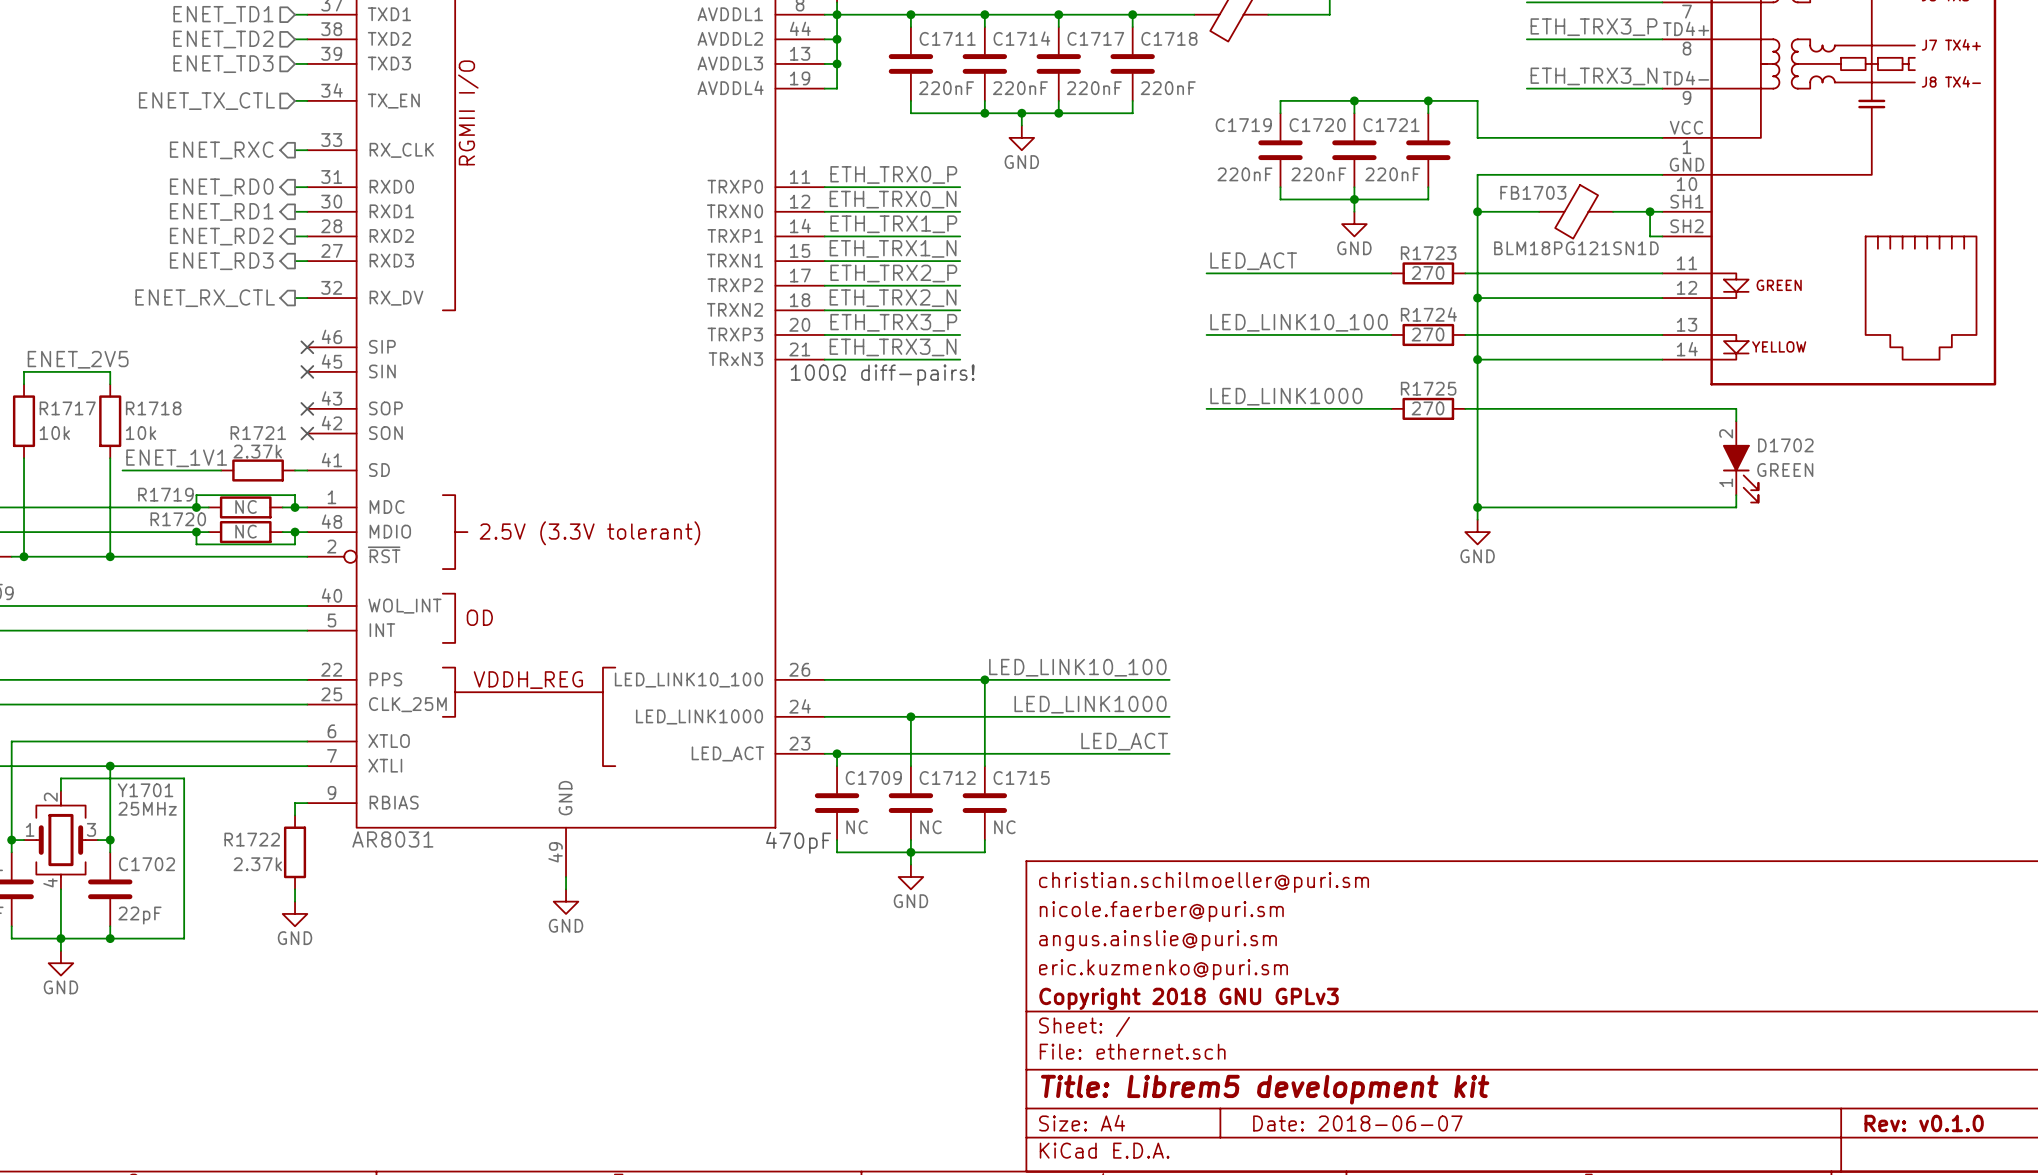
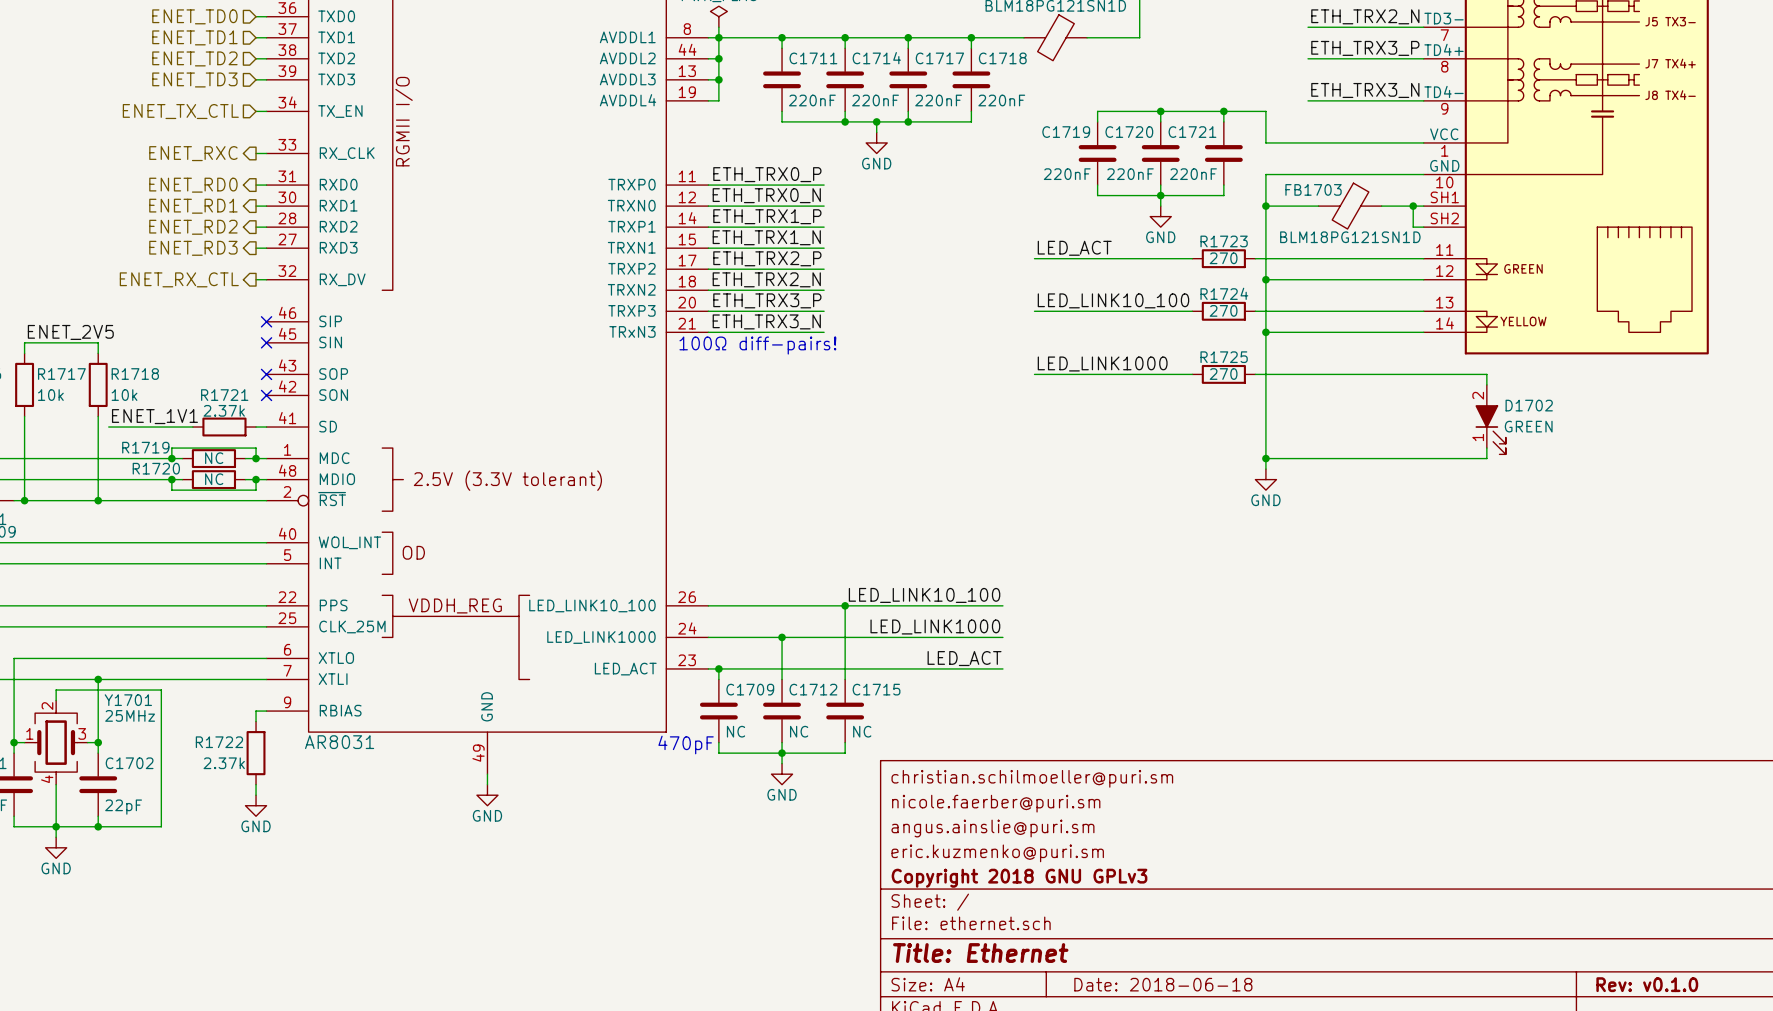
title block: Title: Librem5 development kit (1265, 1089) -> Title: Ethernet (980, 953)
title block: Date: 2018-06-07 (1357, 1123) -> Date: 2018-06-18 (1163, 984)

